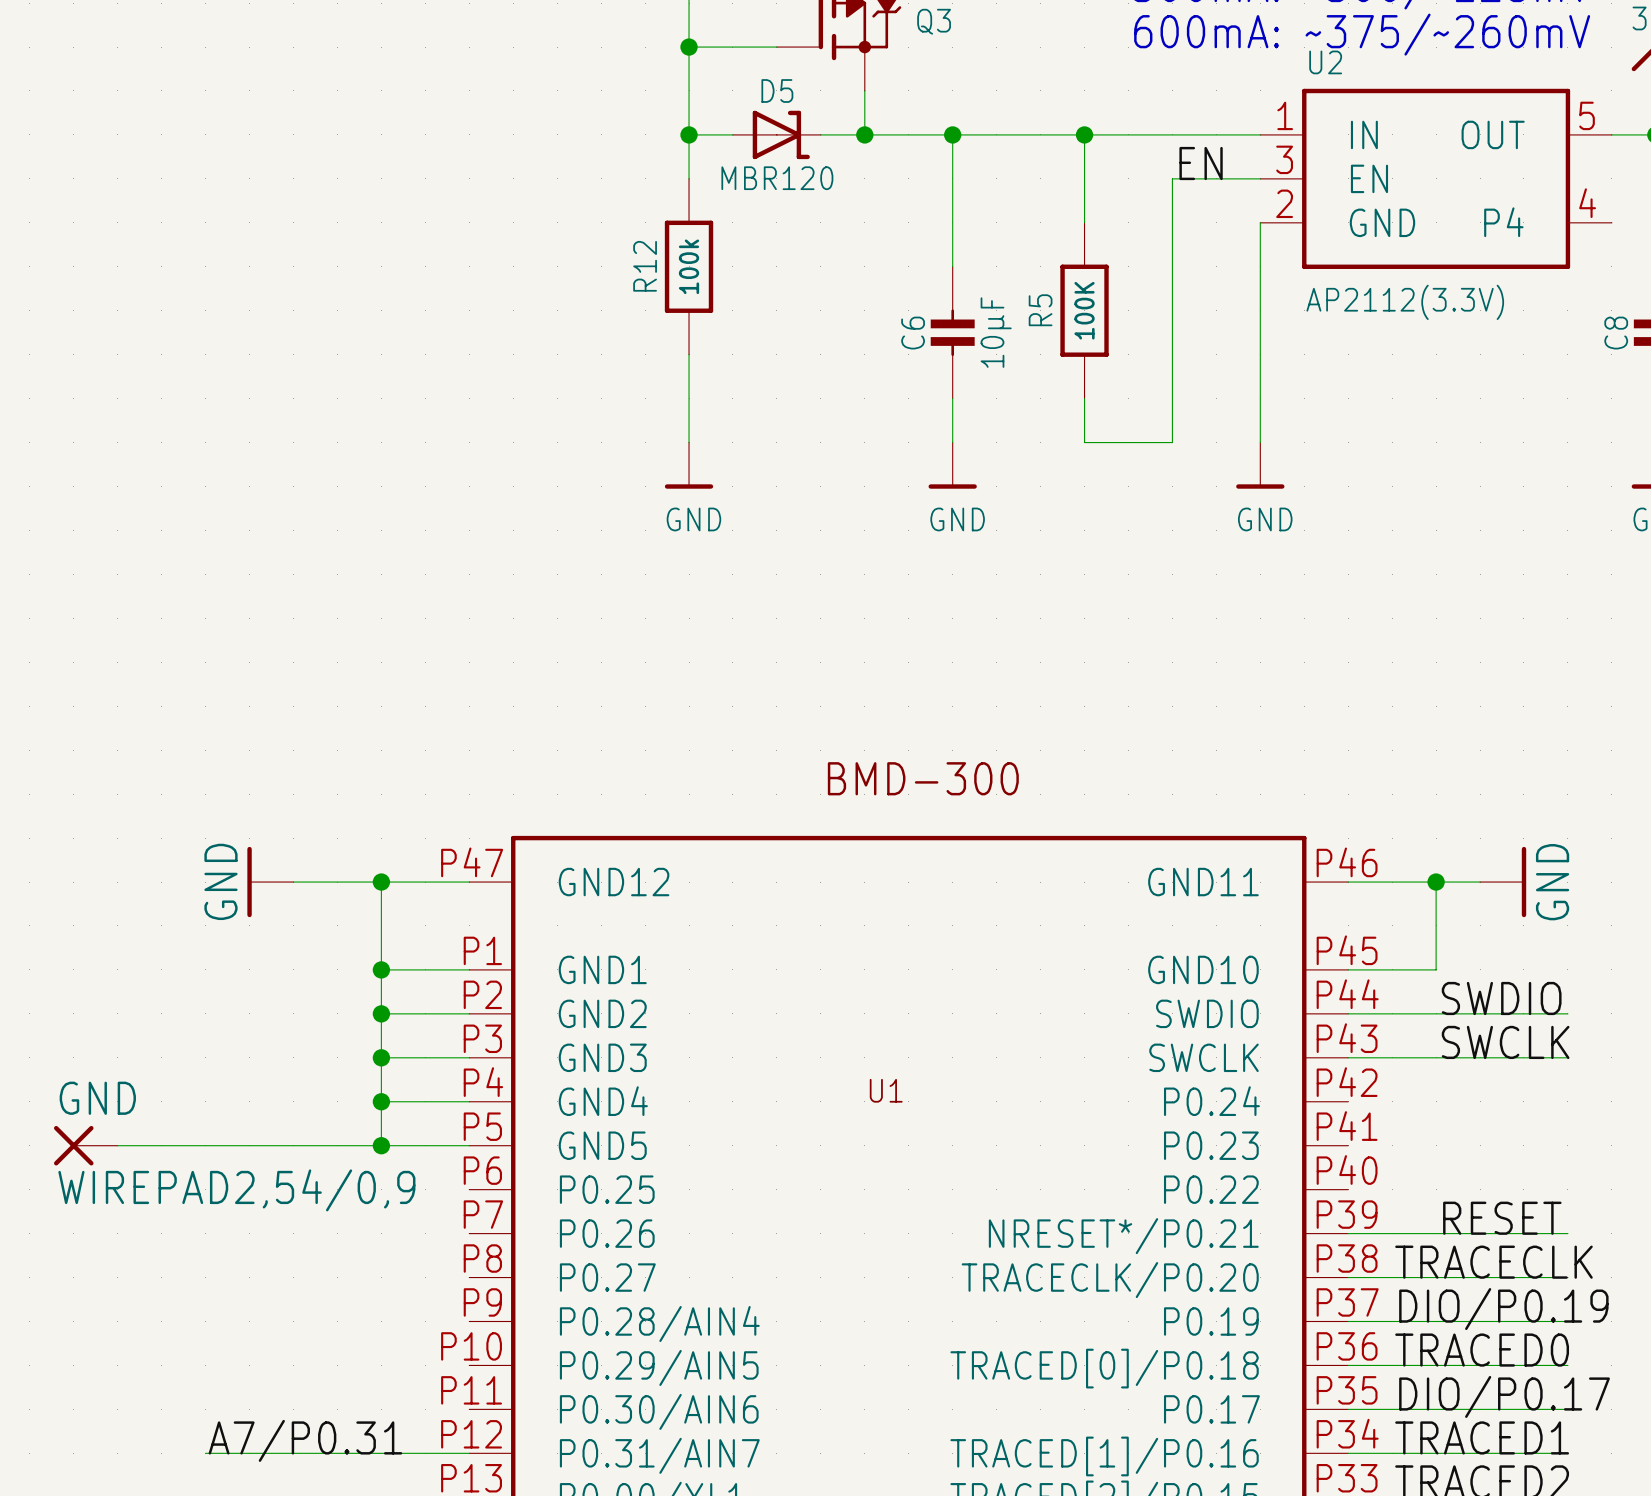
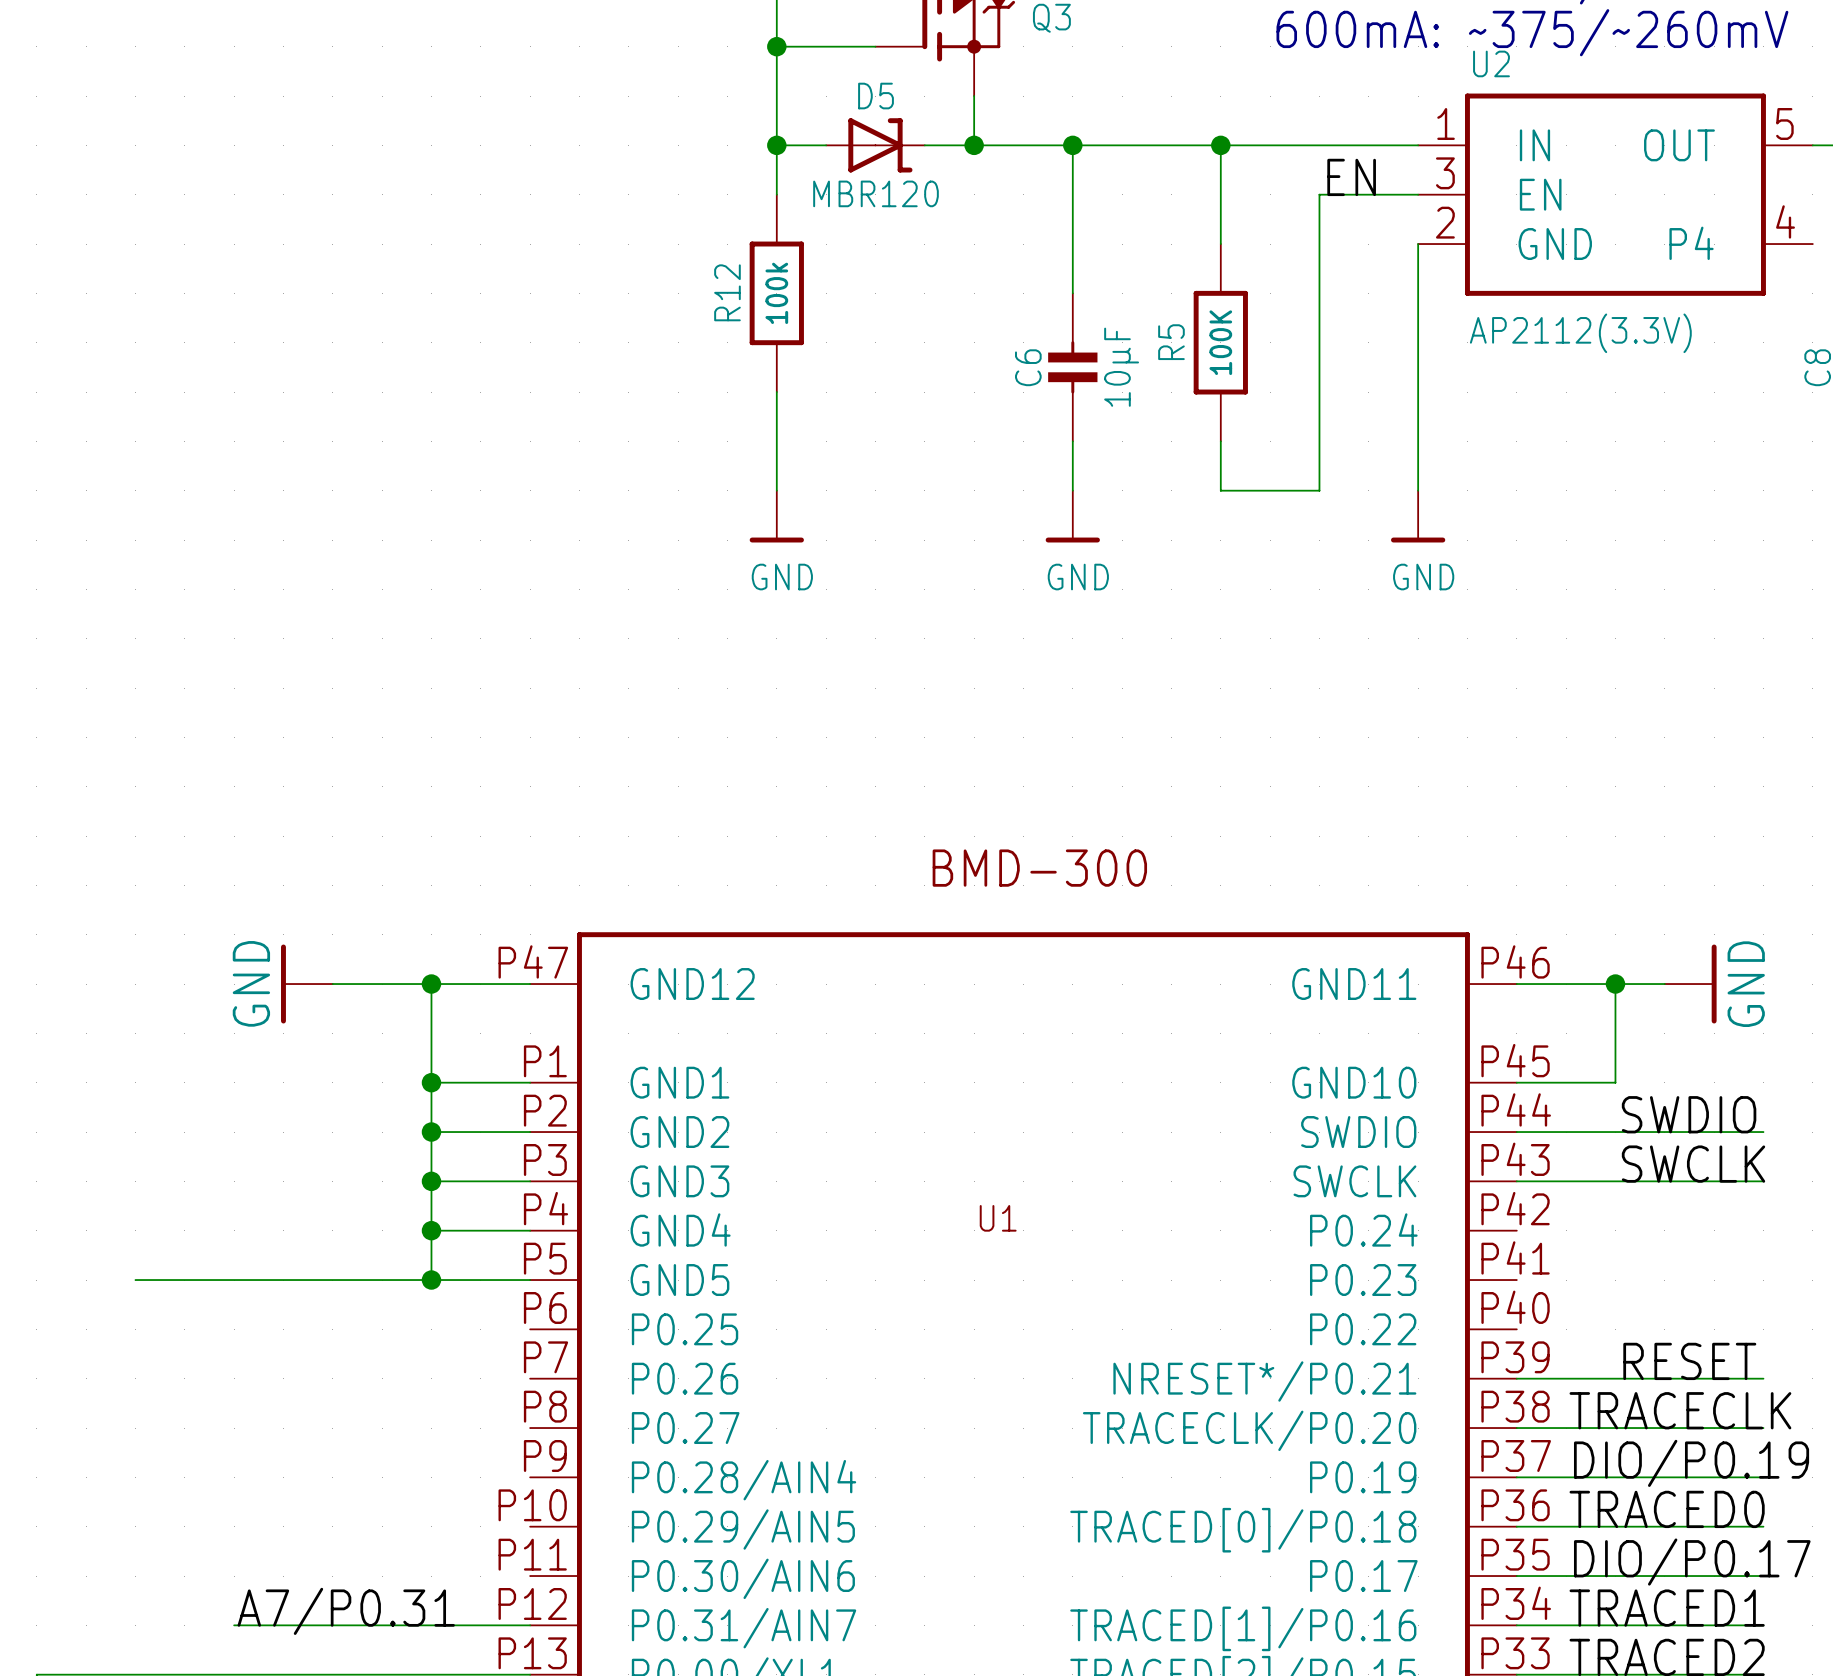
GND: WIREPAD2,54/0,9 (85, 1145) -> none

